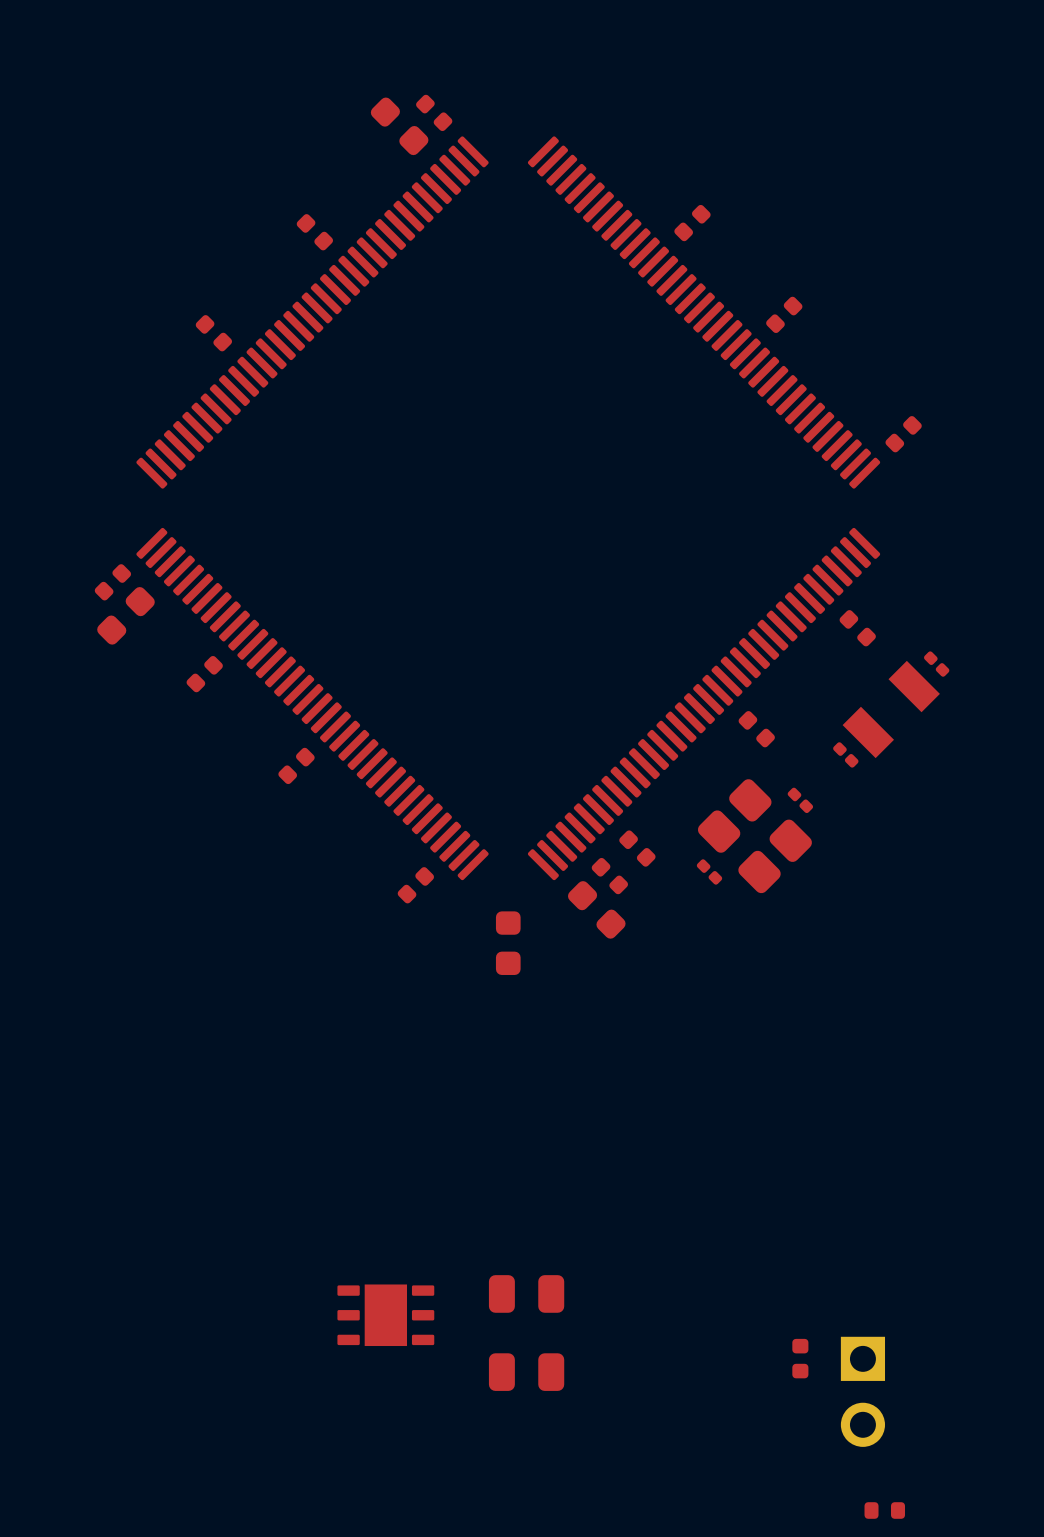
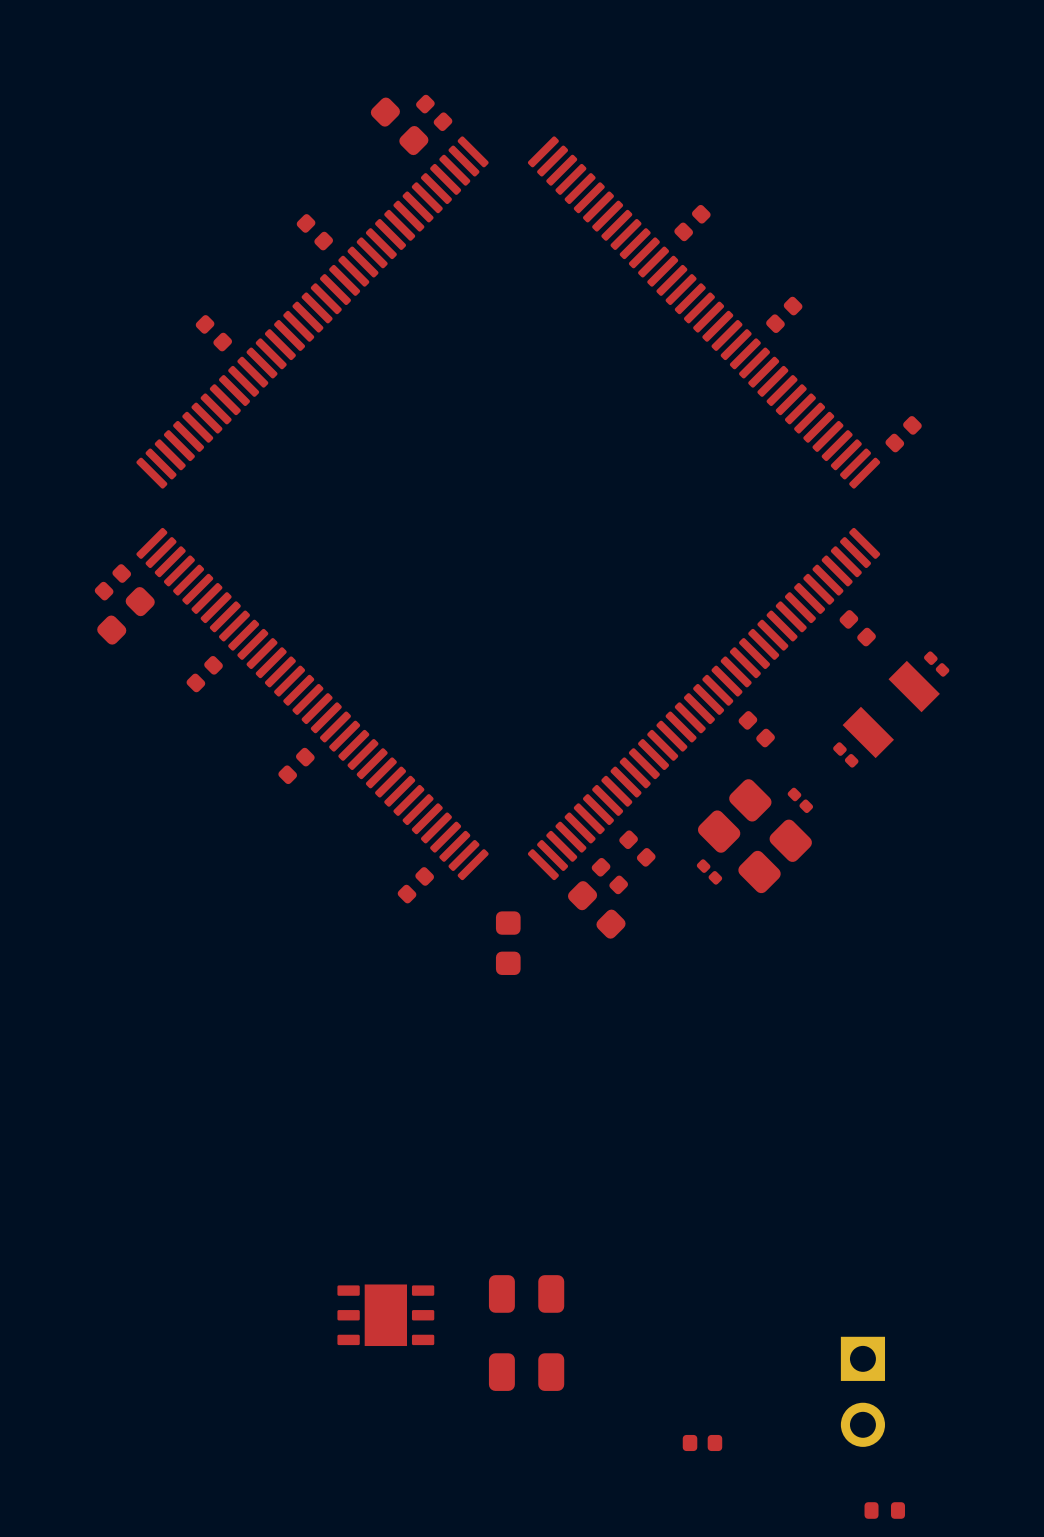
part rotation: 0° (800, 1358) -> 90° clockwise (702, 1442)
part position: (800, 1358) -> (702, 1442)

